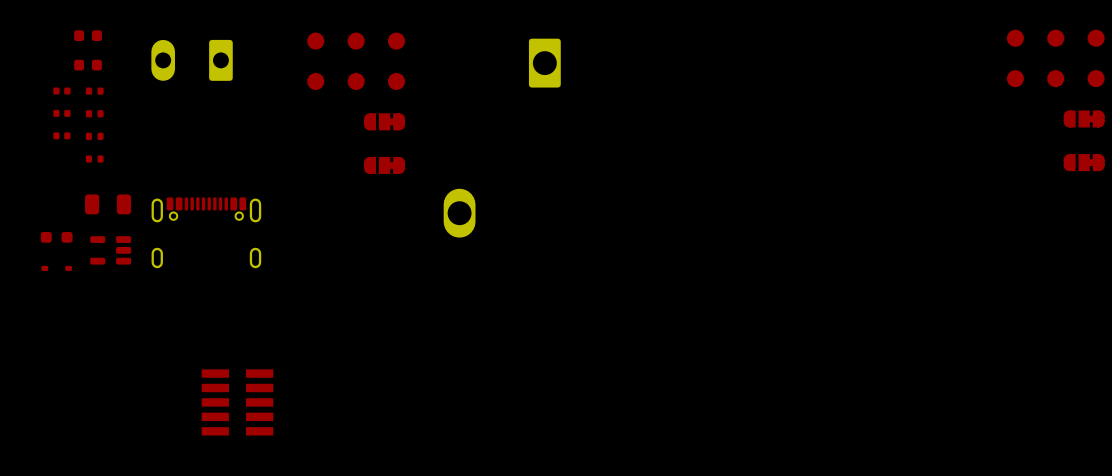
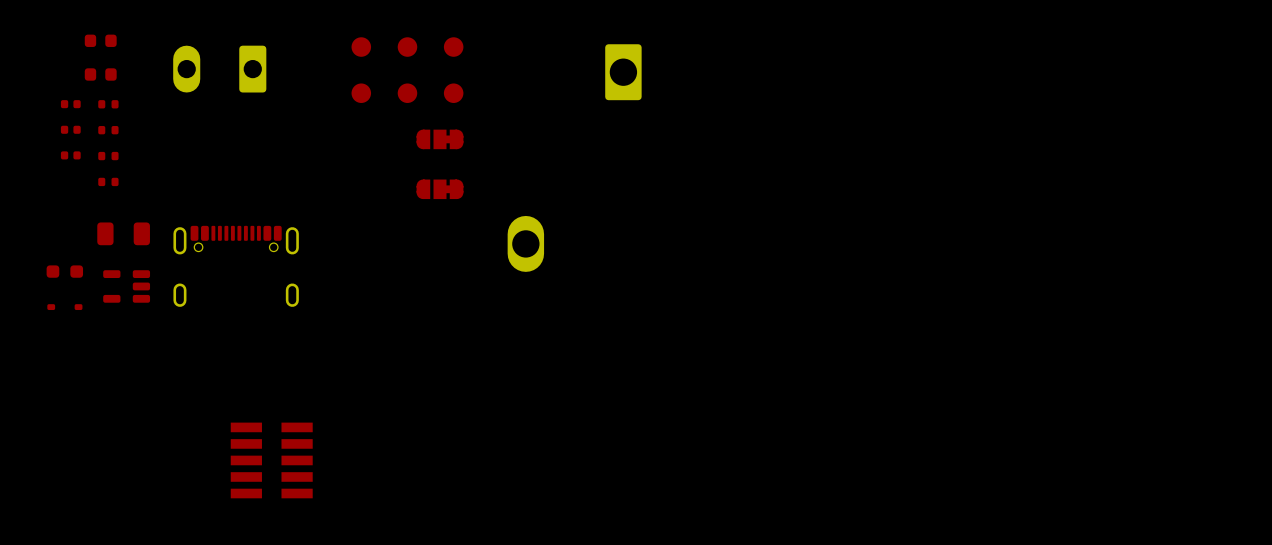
part: (1015, 38) -> none
part: (1055, 38) -> none
part: (1096, 38) -> none
part: (1015, 78) -> none
part: (1055, 78) -> none
part: (1096, 78) -> none
part: (1084, 118) -> none
part: (1084, 162) -> none

